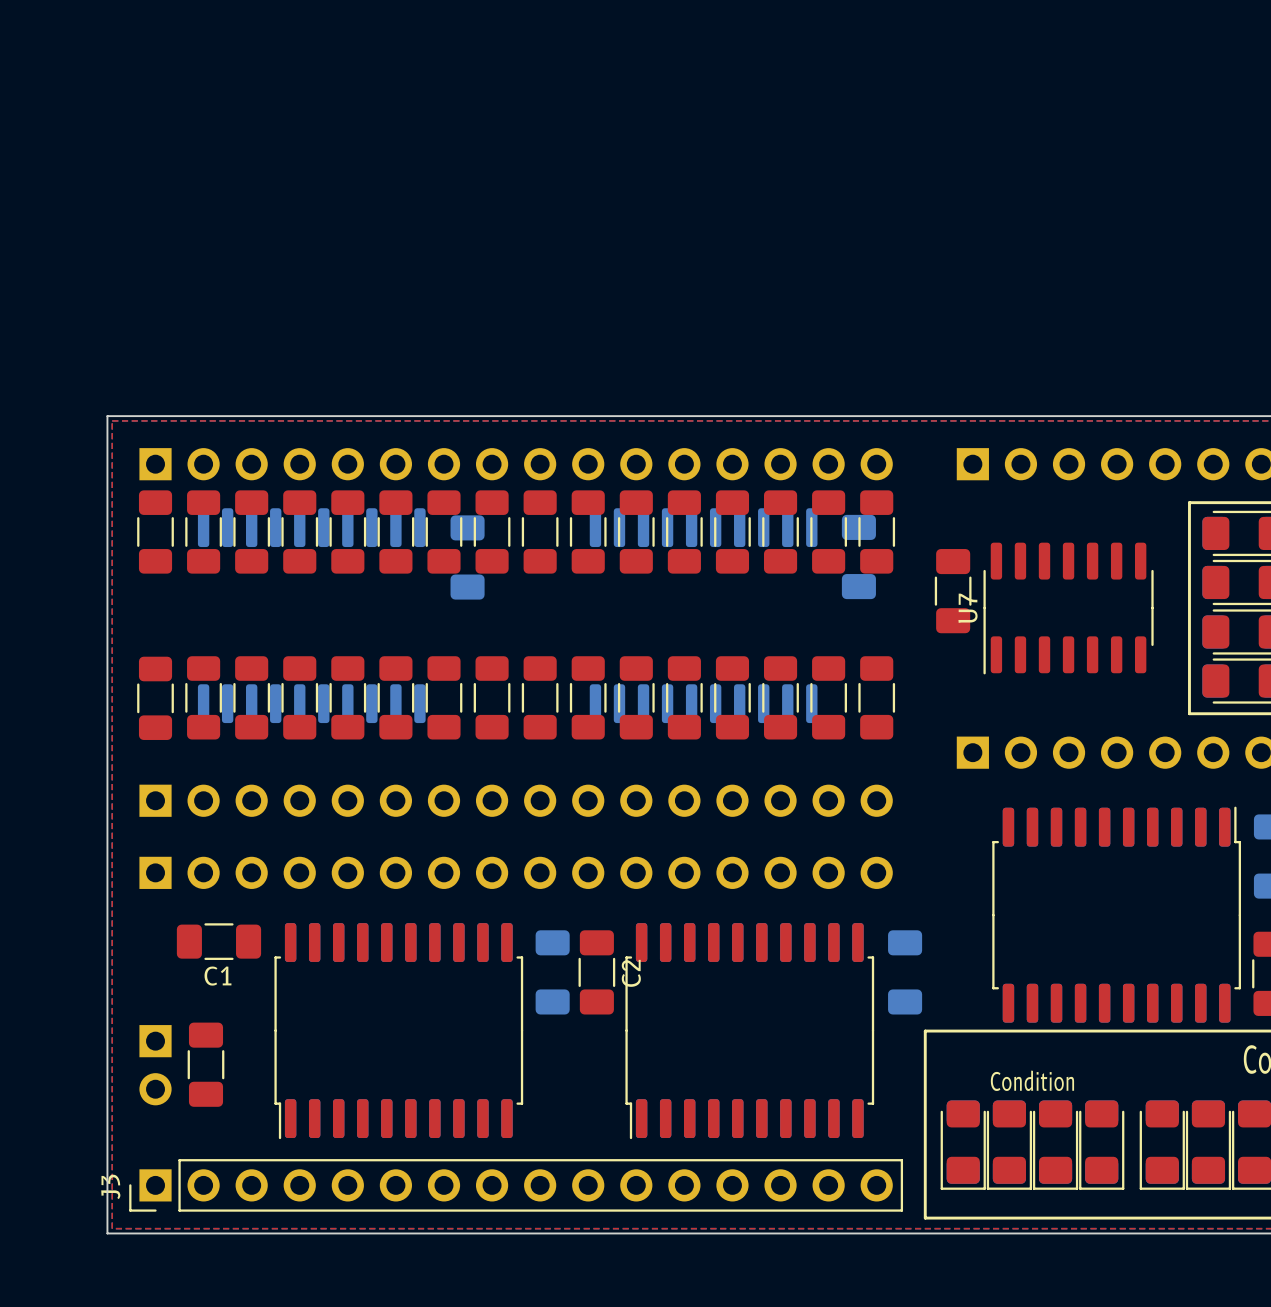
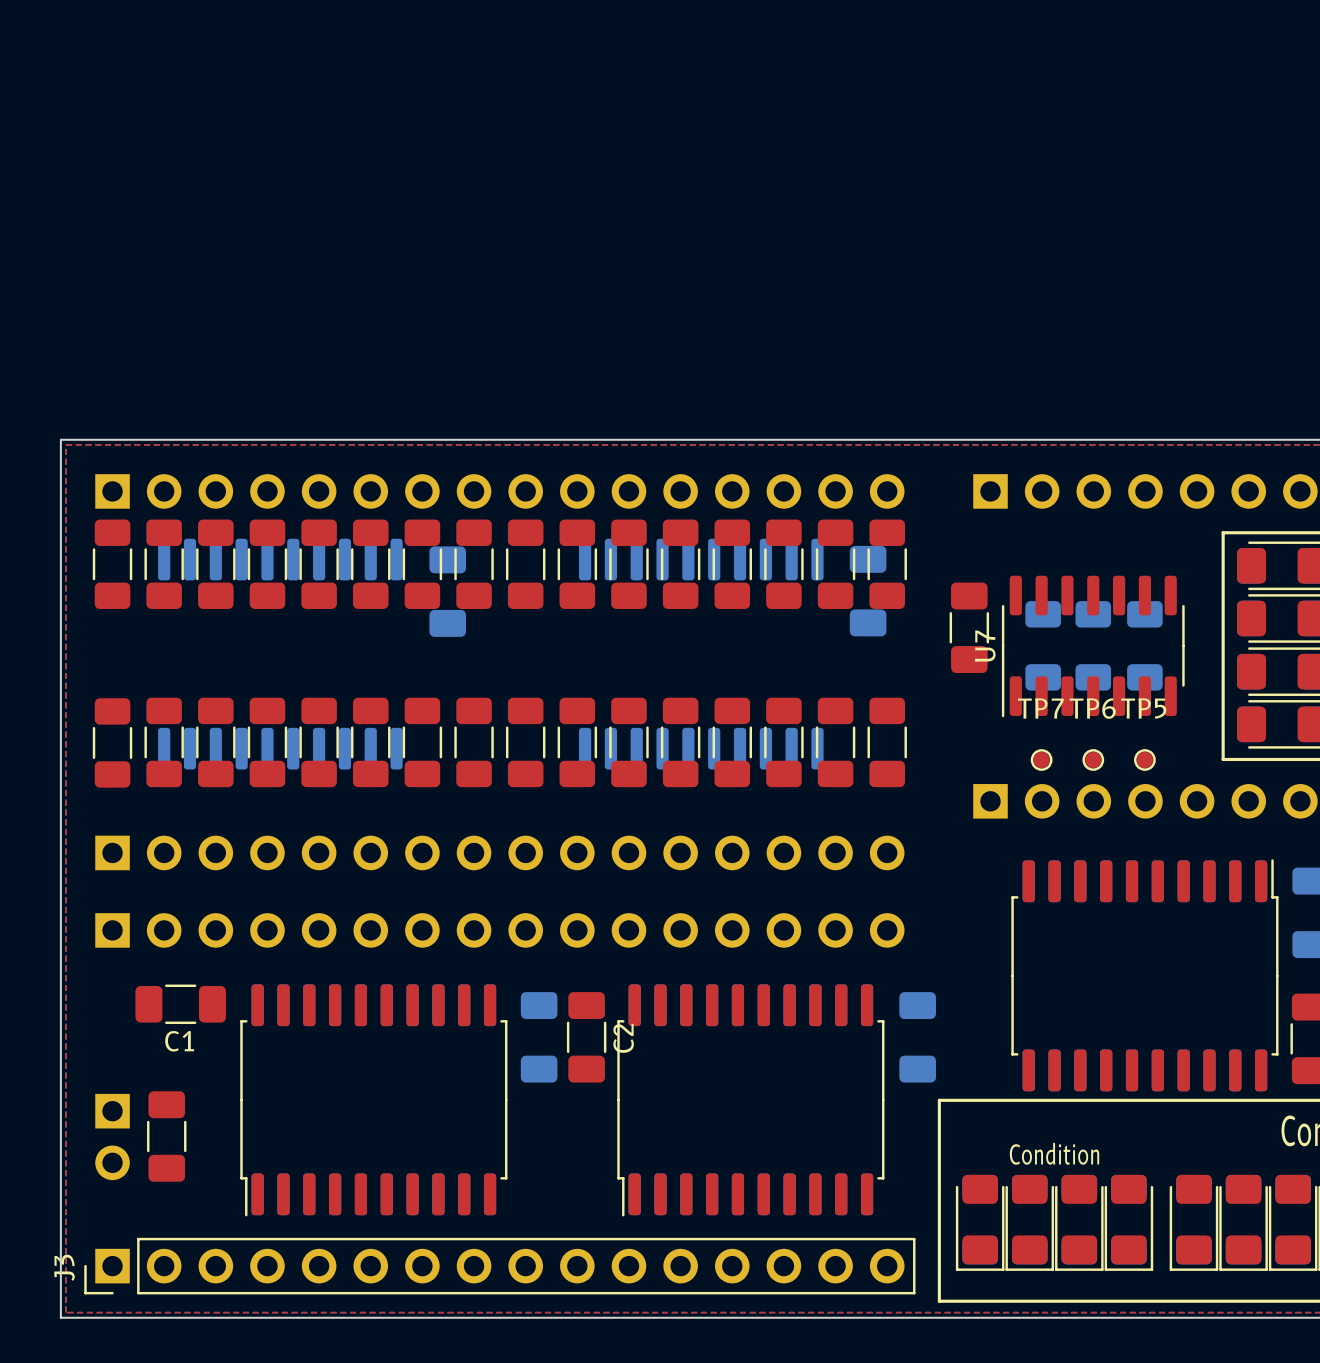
part: none -> (1043, 645)
part: none -> (1093, 645)
part: none -> (1144, 645)
TP7: none -> (1041, 759)
TP6: none -> (1093, 759)
TP5: none -> (1144, 759)

